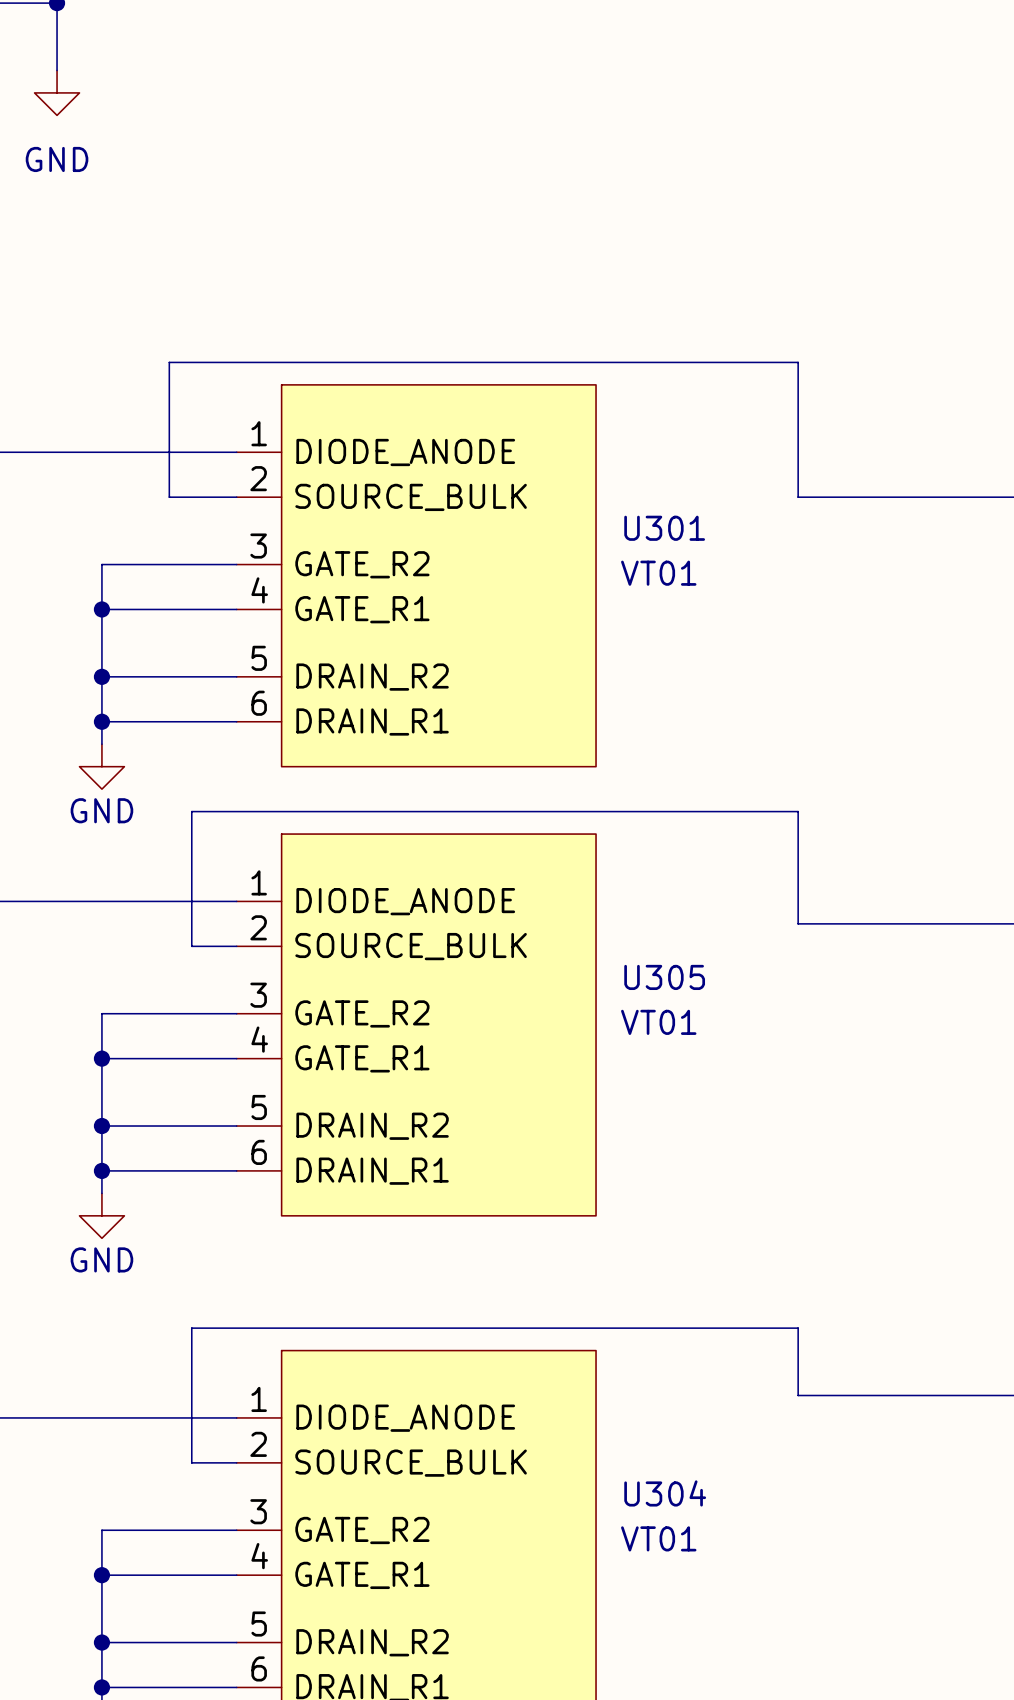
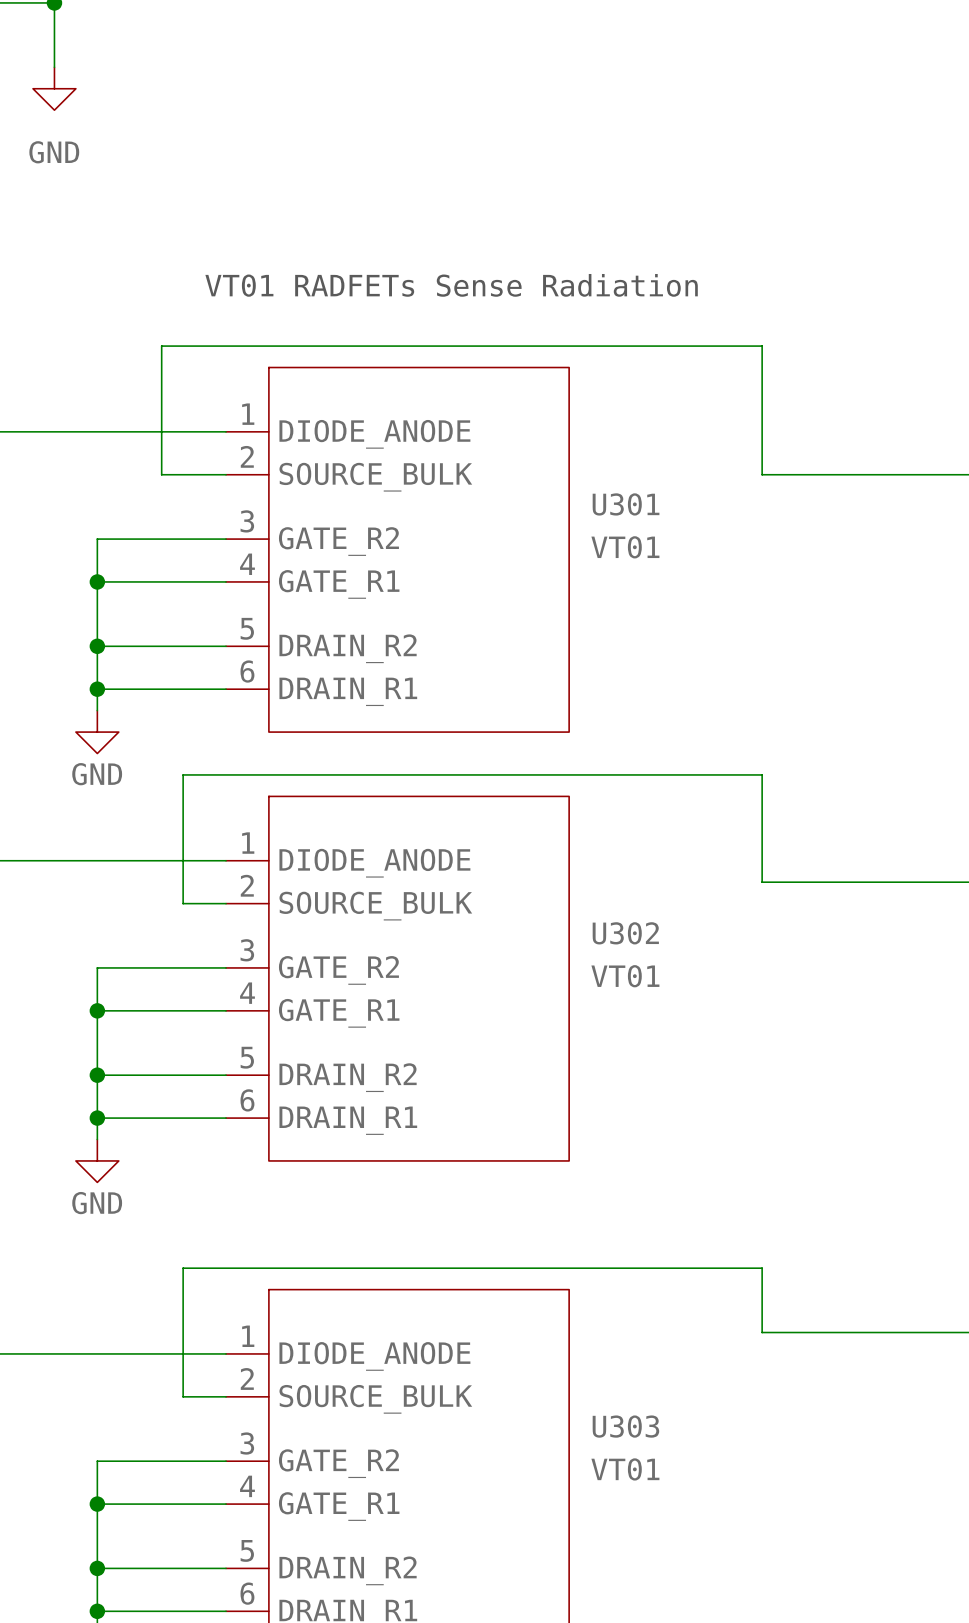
text: none -> VT01 RADFETs Sense Radiation (451, 285)
U305 name: U305 (664, 977) -> U302 (625, 933)
U304 name: U304 (665, 1493) -> U303 (625, 1426)

